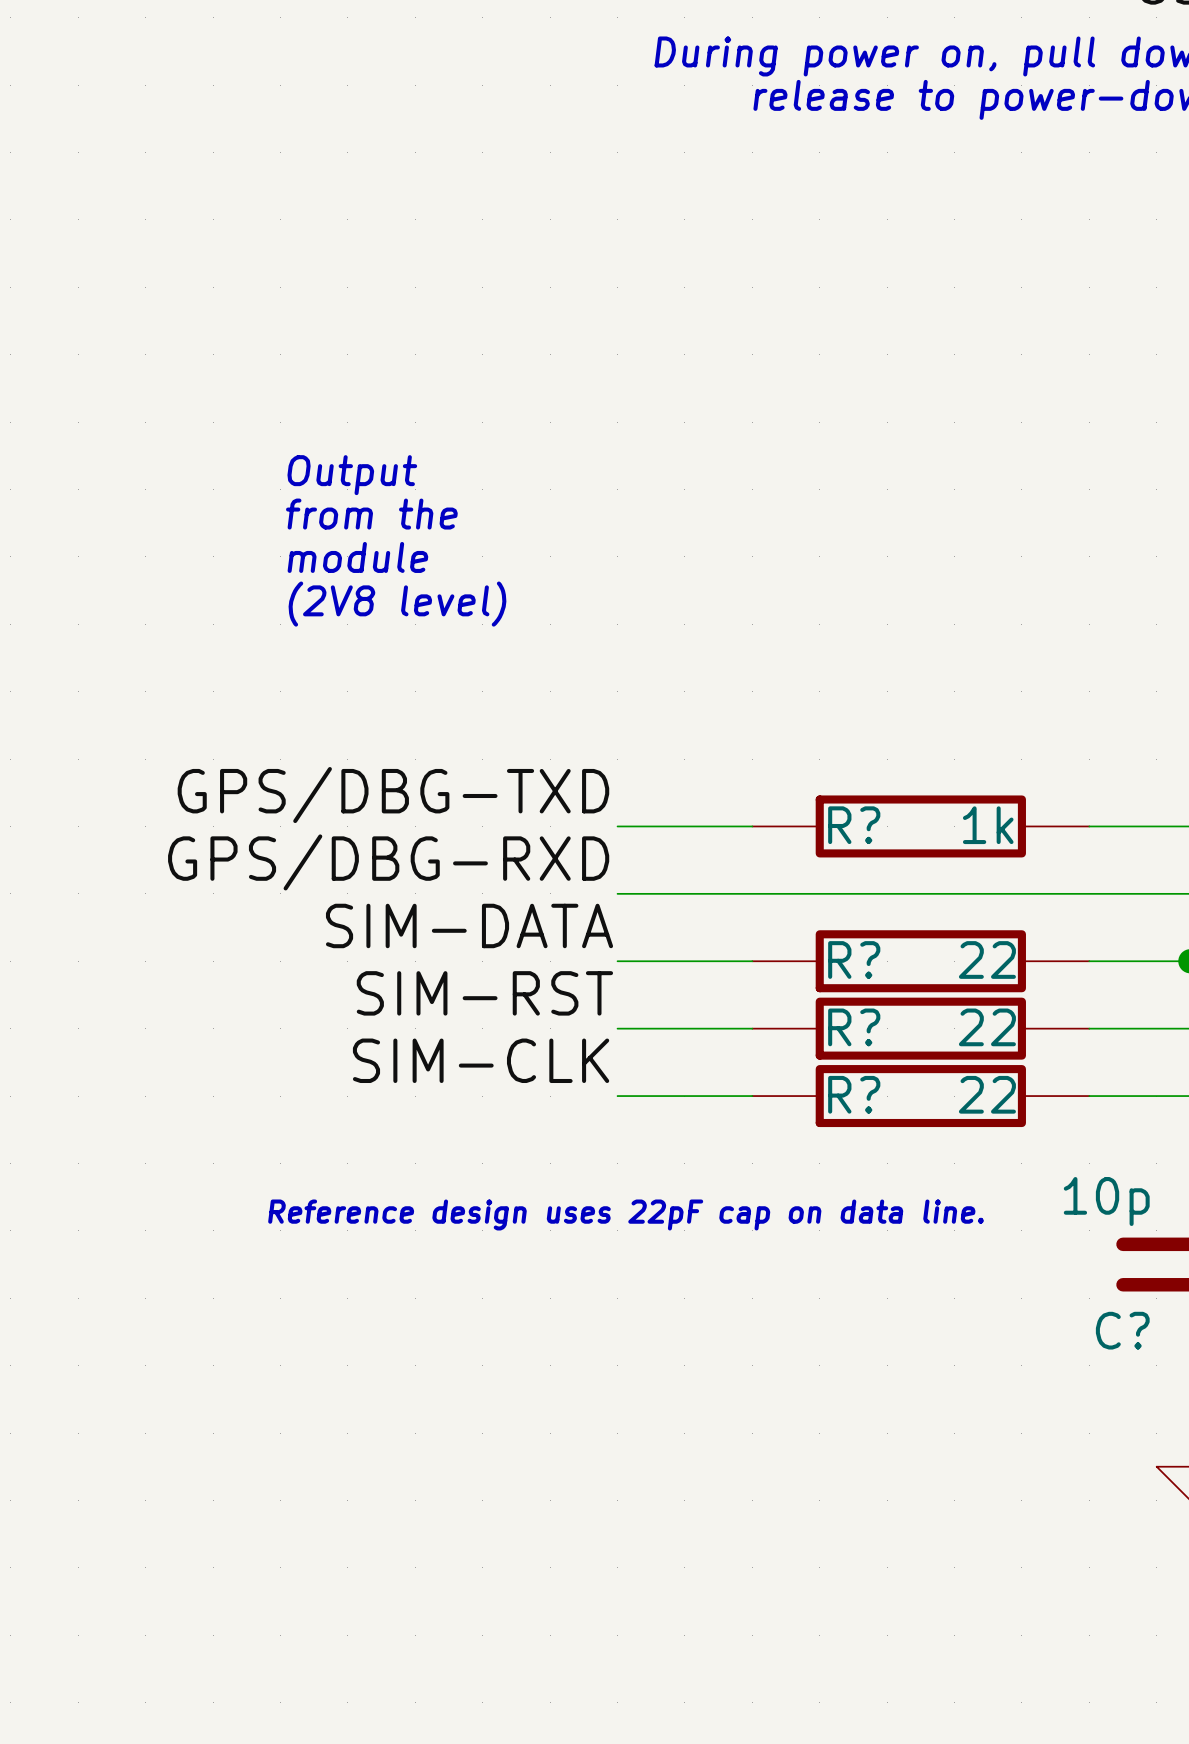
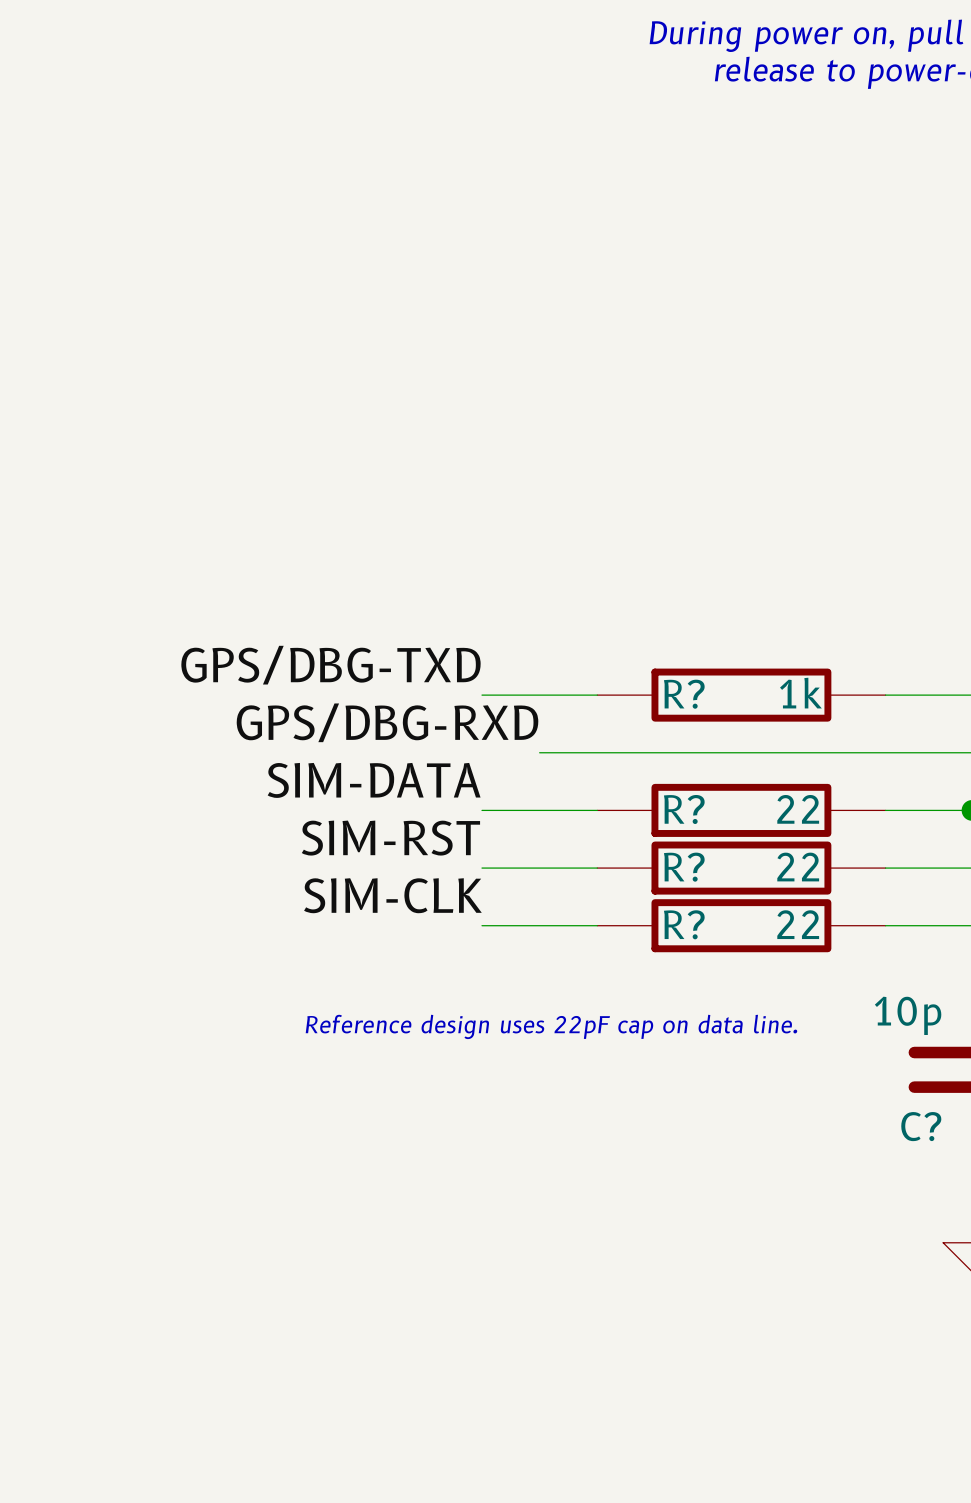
text: Output (352, 475) -> none
text: from the (371, 514) -> none
text: module (357, 557) -> none
text: (2V8 level) (397, 604) -> none
label position: GPS/DBG-RXD (388, 862) -> GPS/DBG-RXD (387, 722)
wire: (617, 893) (684, 893) -> none

